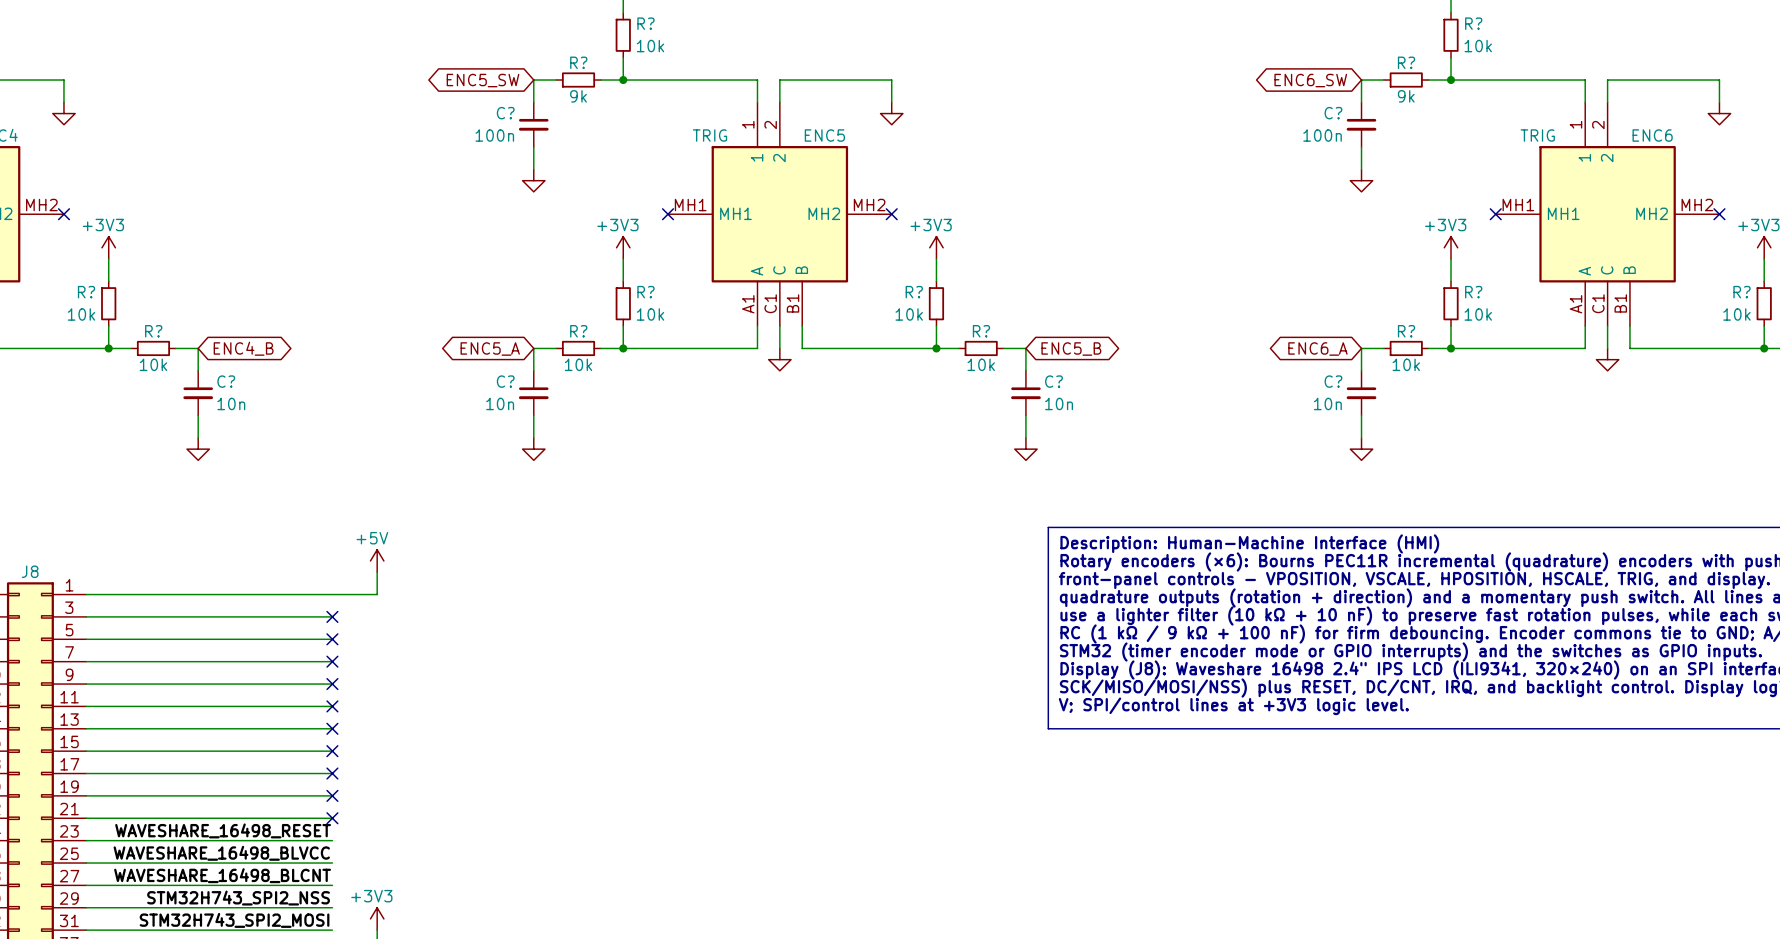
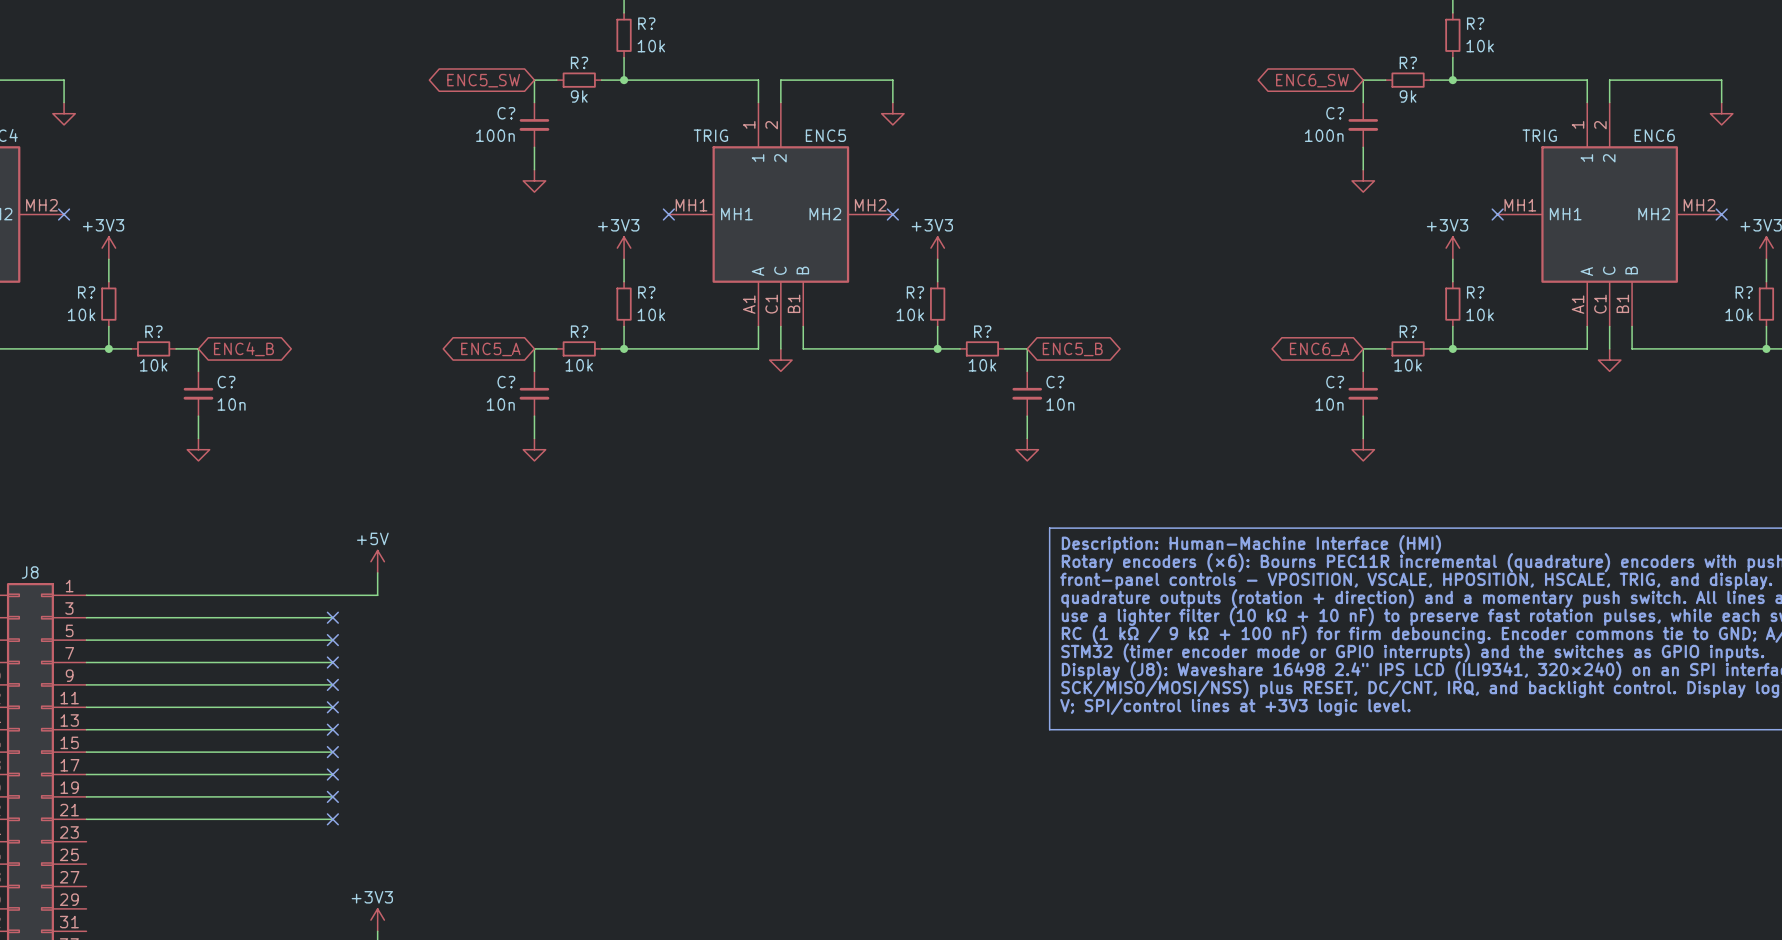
label: WAVESHARE_16498_RESET (223, 830) -> none
wire: (86, 840) (332, 840) -> none
label: WAVESHARE_16498_BLVCC (221, 853) -> none
wire: (86, 863) (332, 863) -> none
label: WAVESHARE_16498_BLCNT (222, 875) -> none
wire: (86, 885) (332, 885) -> none
label: STM32H743_SPI2_NSS (238, 898) -> none
wire: (86, 907) (332, 907) -> none
label: STM32H743_SPI2_MOSI (234, 920) -> none
wire: (86, 930) (332, 930) -> none

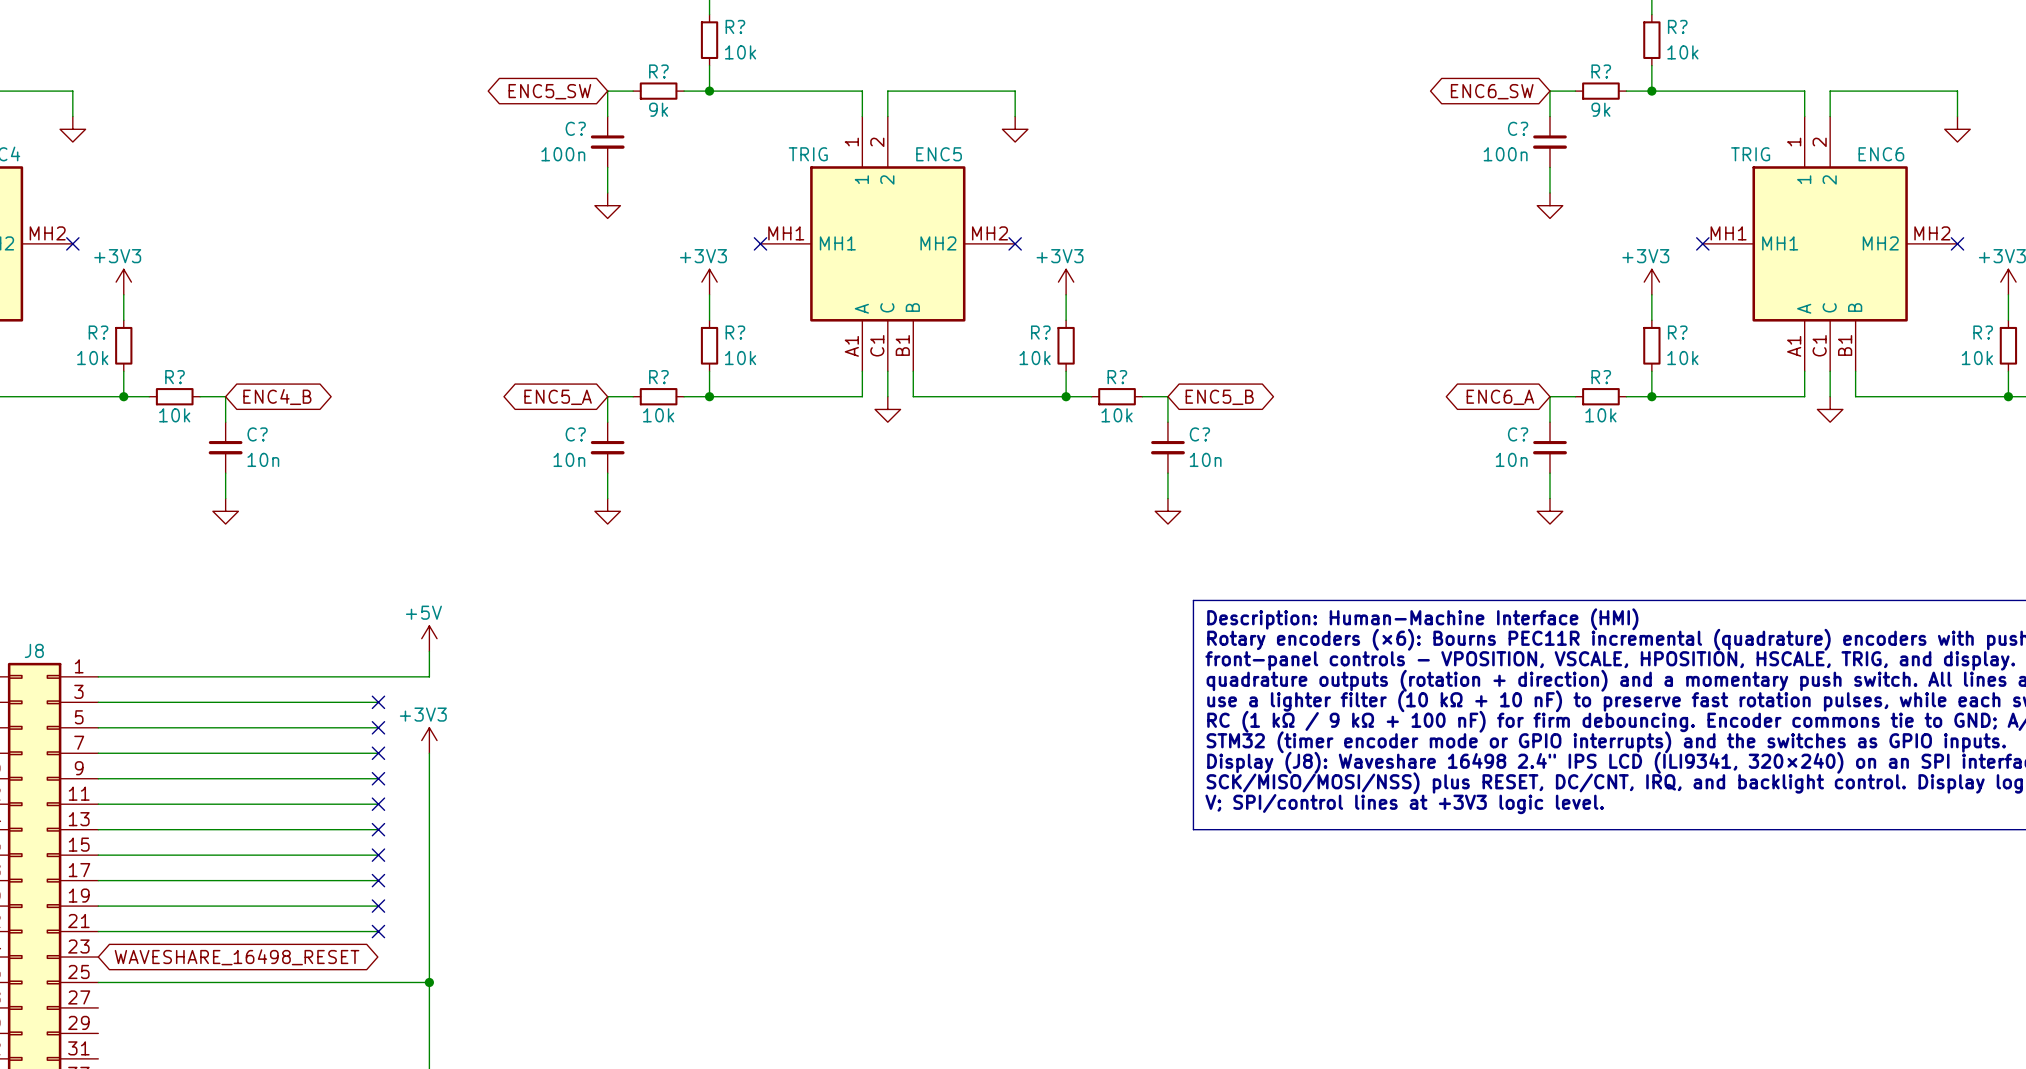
power symbol: none -> +3V3 (429, 740)
wire: none -> (429, 753) (429, 1058)
global label: none -> WAVESHARE_16498_RESET (237, 957)
wire: none -> (98, 982) (429, 982)
junction: none -> (429, 982)
power symbol: +3V3 (377, 920) -> none

